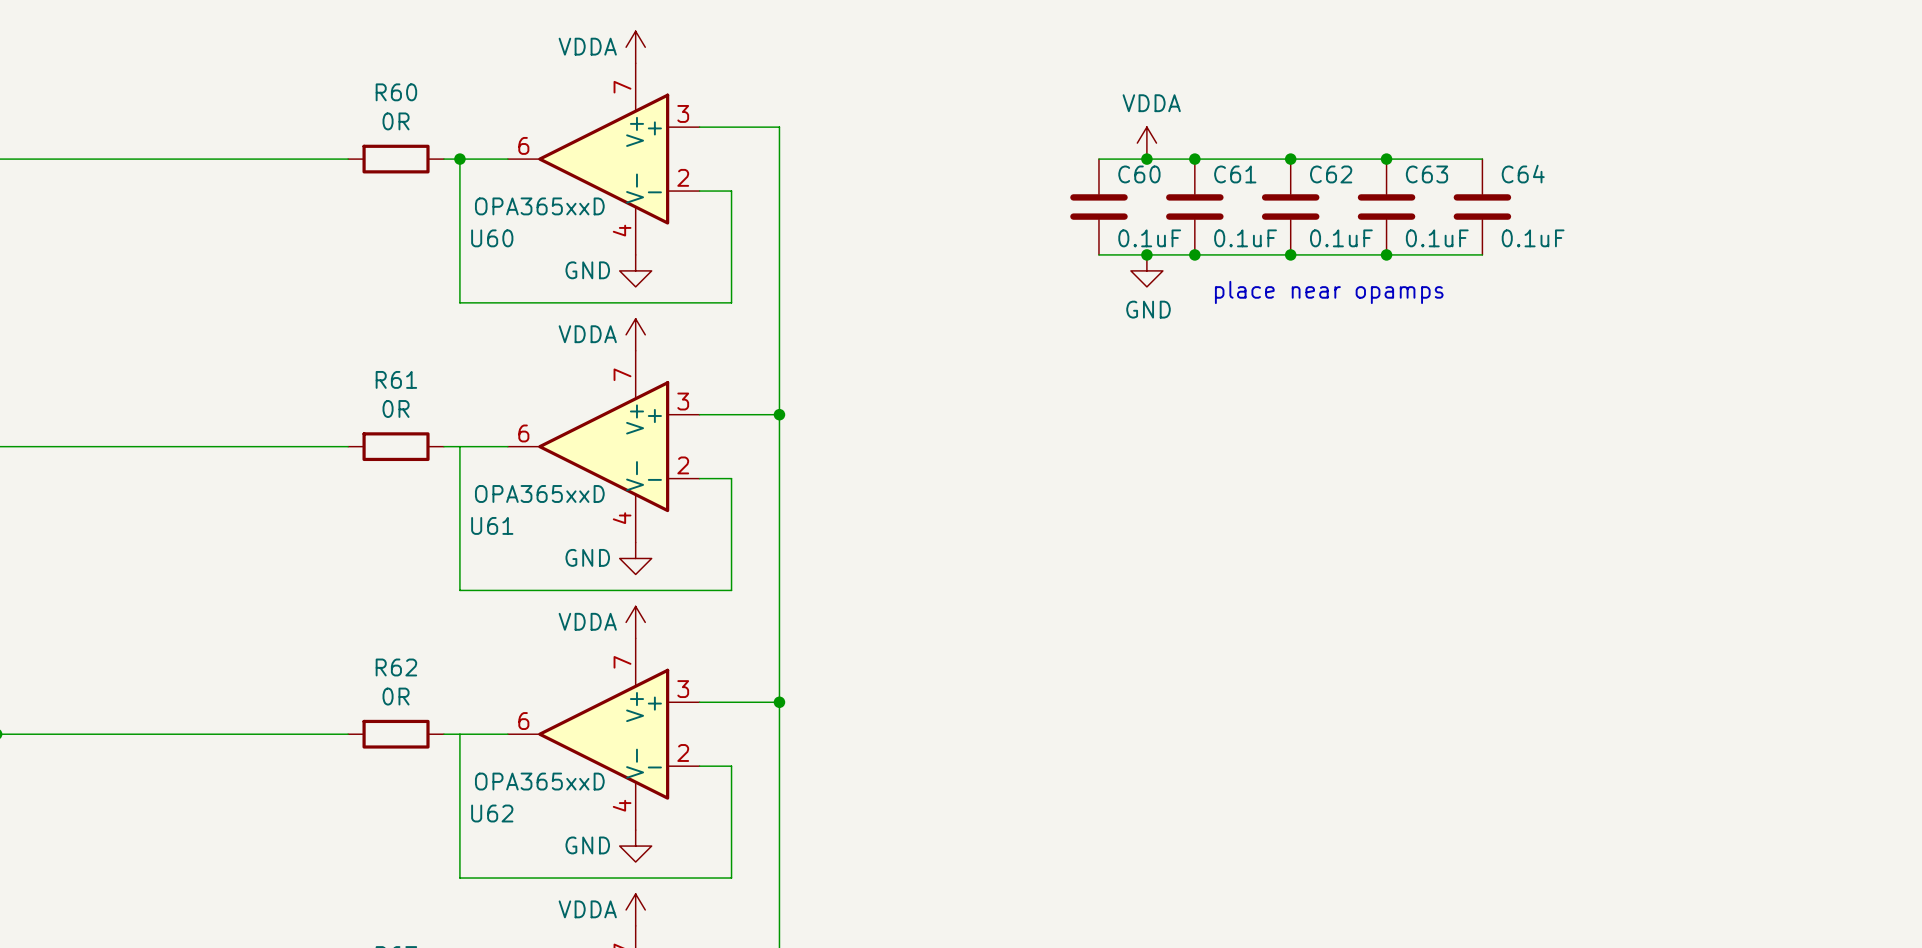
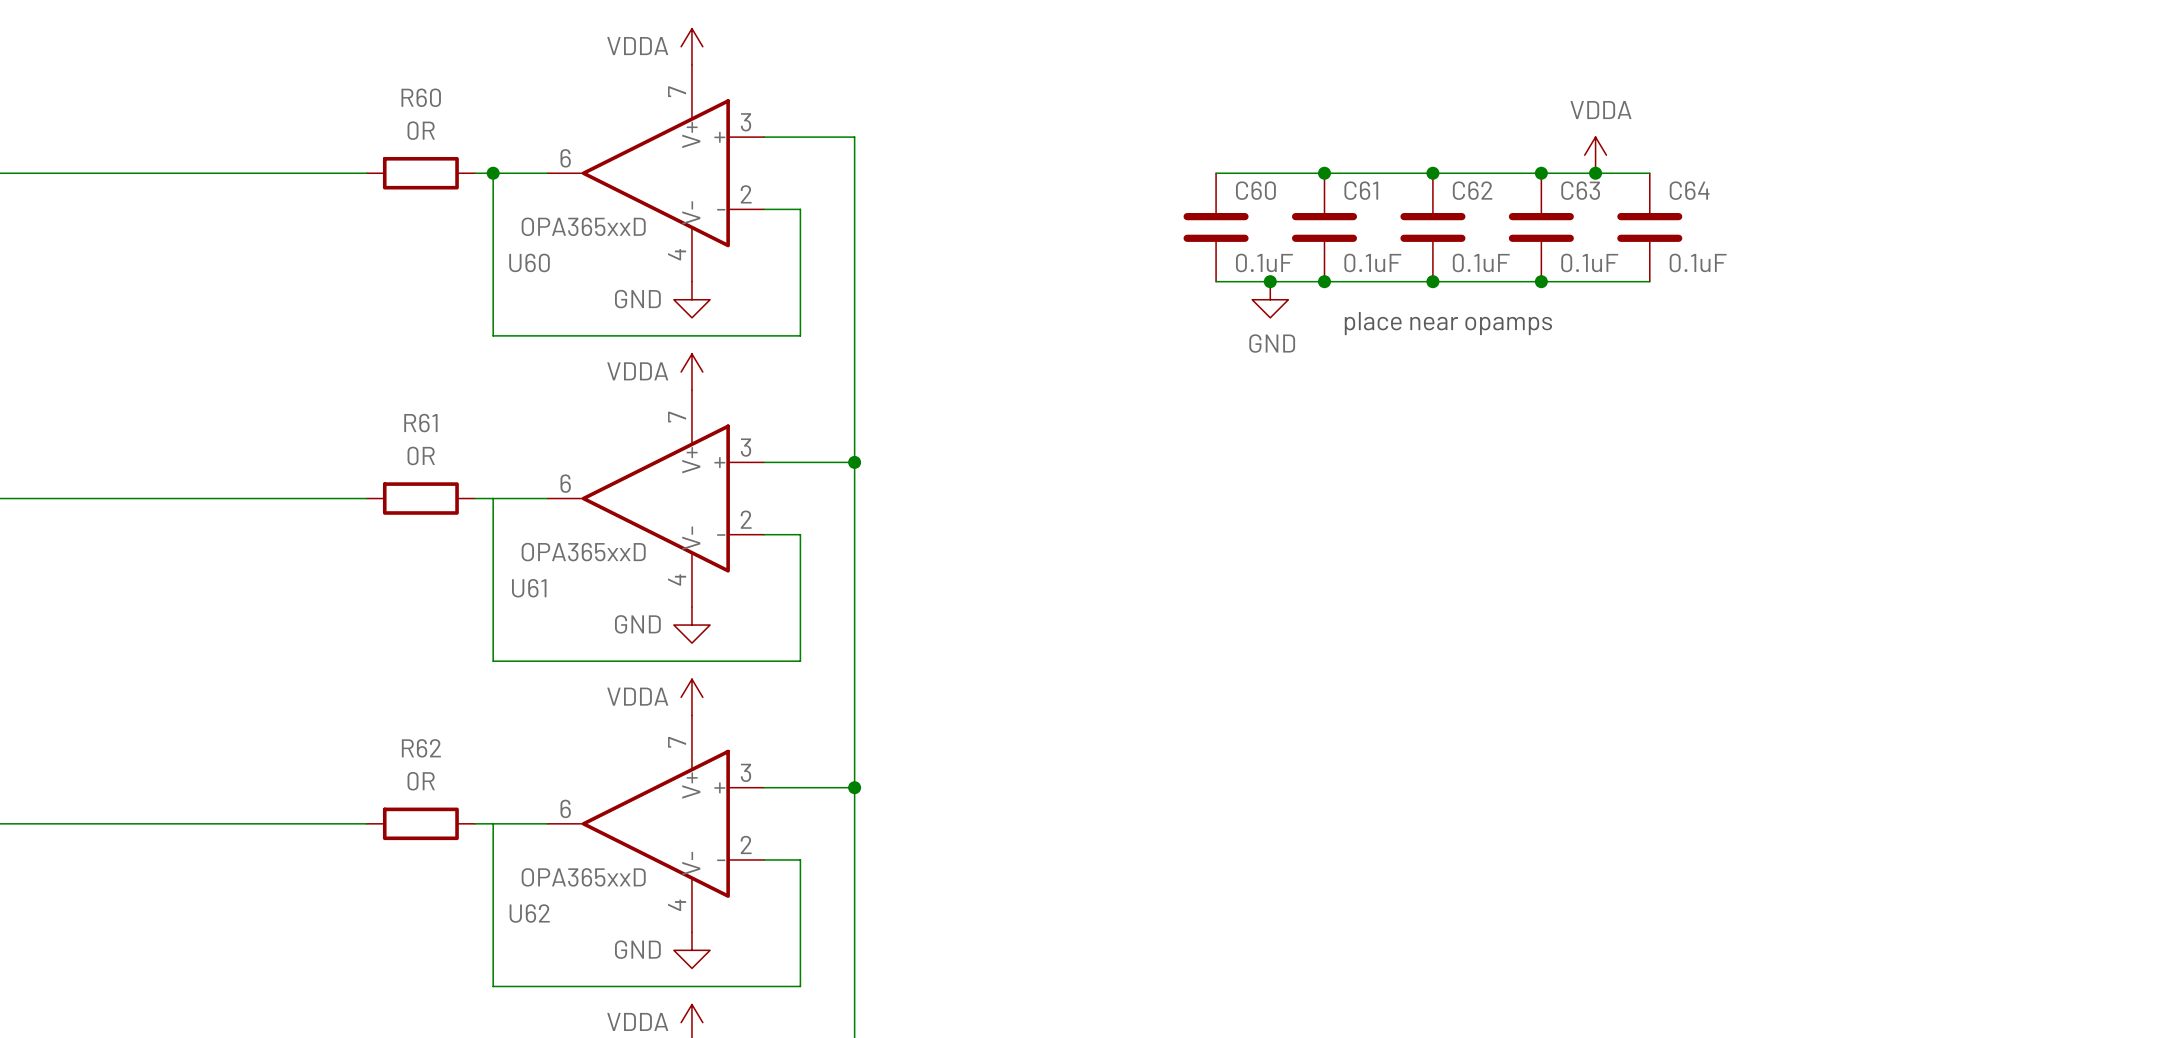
power symbol position: VDDA (1146, 143) -> VDDA (1595, 155)
junction: (1146, 159) -> none
junction: none -> (1595, 173)

